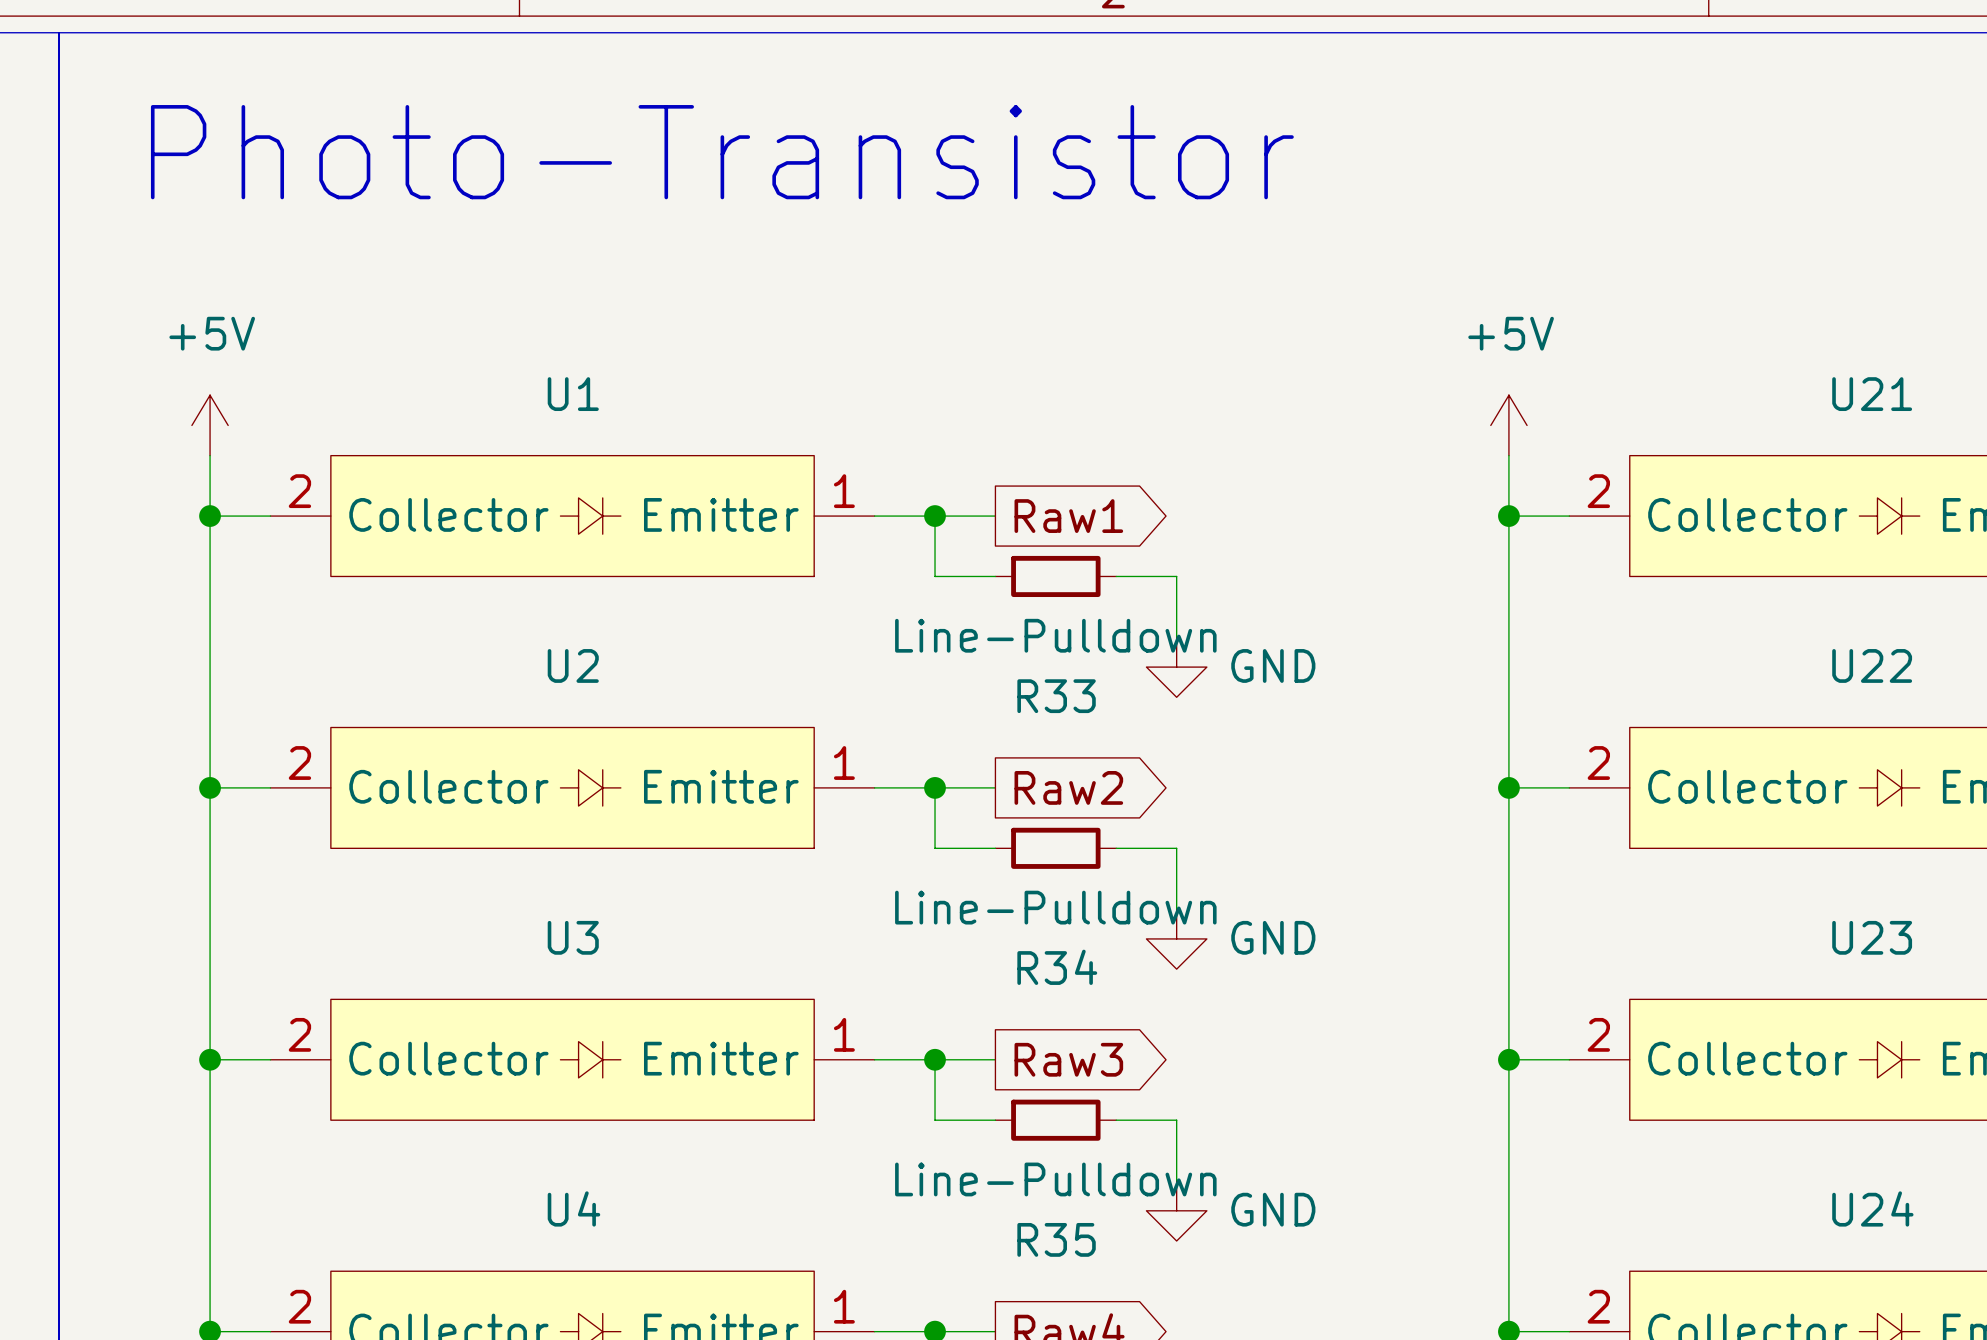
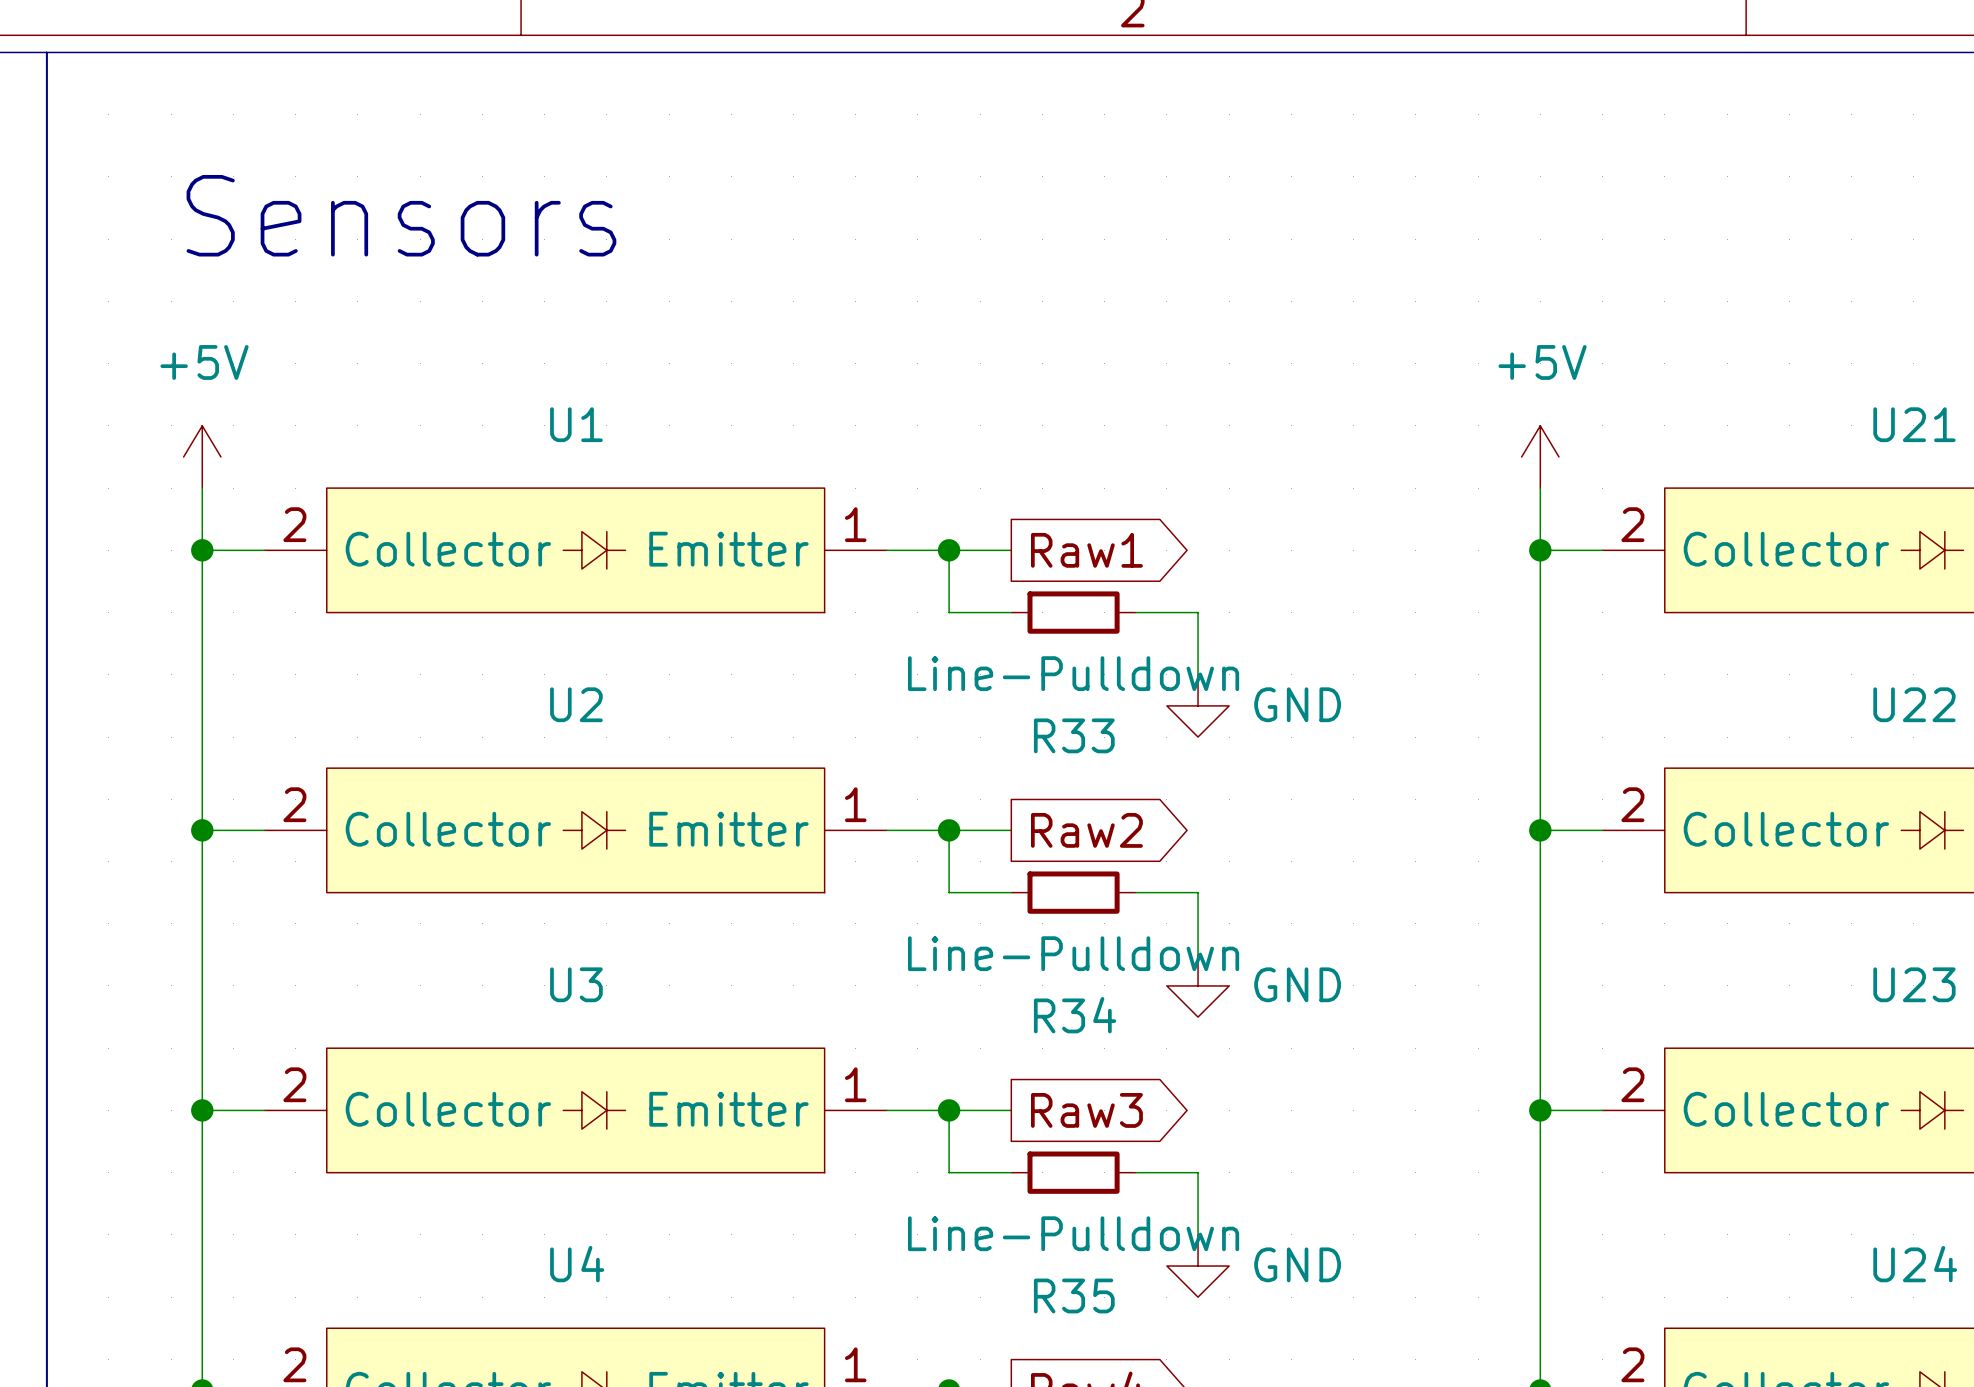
text: Photo-Transistor (722, 152) -> none
text: none -> Sensors (401, 215)

